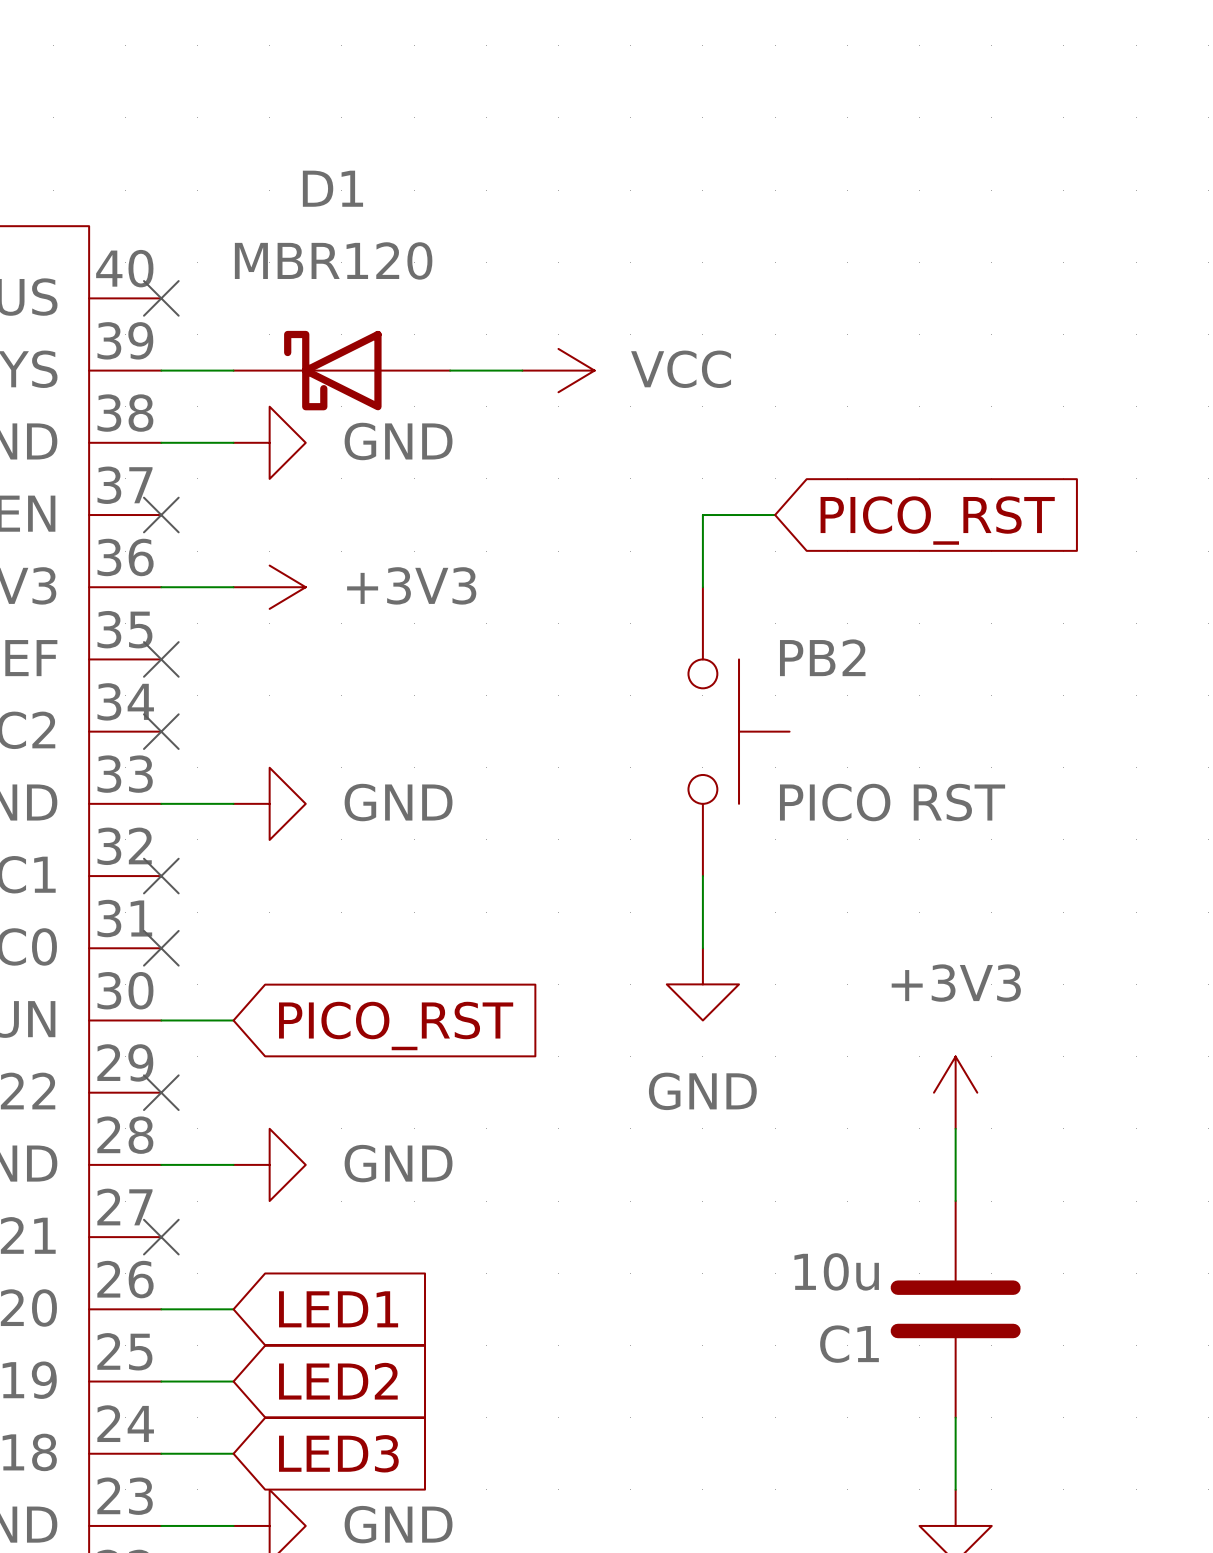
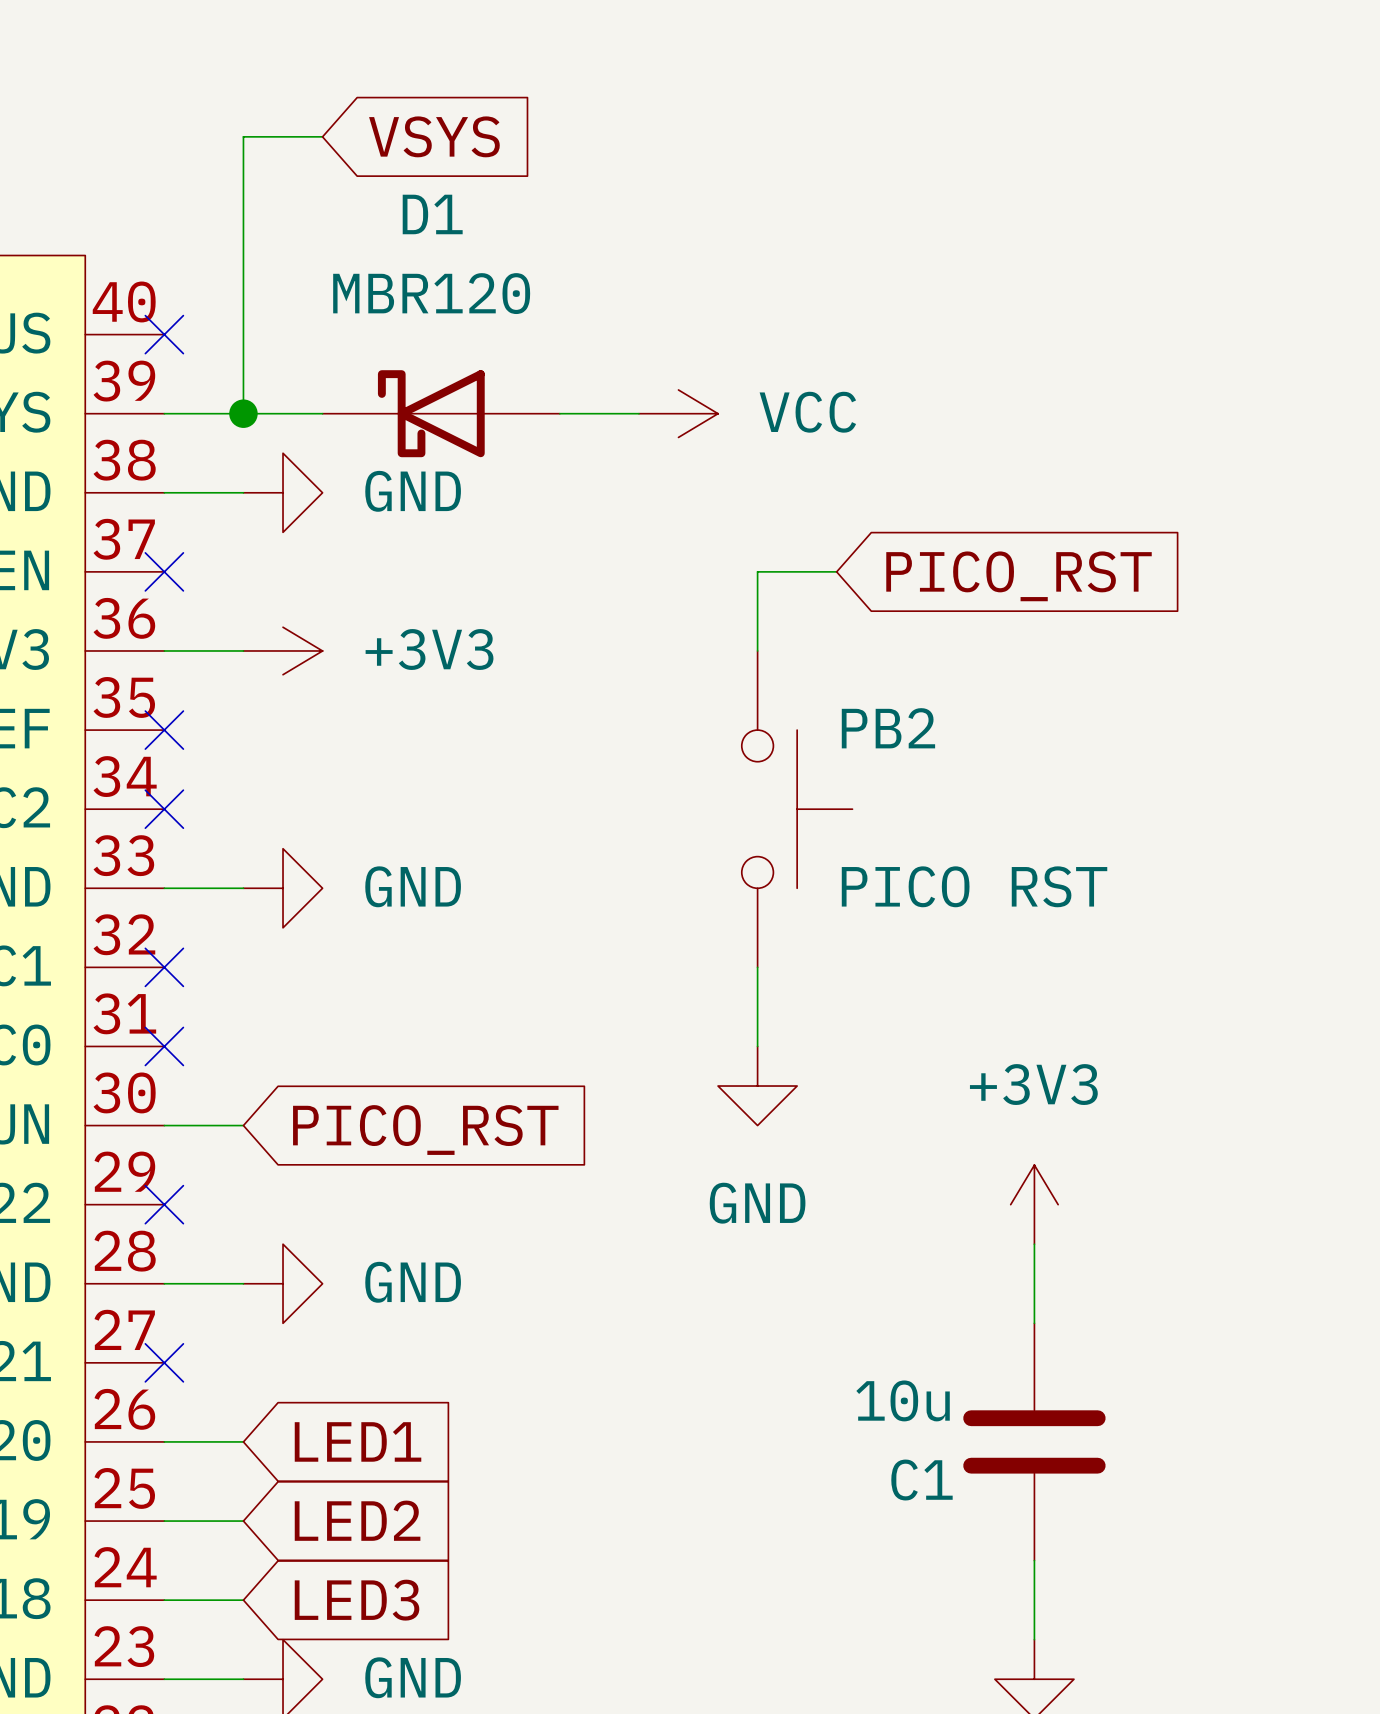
wire: none -> (322, 136) (243, 136) (243, 413) (322, 413)
global label: none -> VSYS (434, 136)
junction: none -> (243, 413)
D1 position: (341, 370) -> (441, 413)
power symbol position: VCC (558, 370) -> VCC (678, 413)

